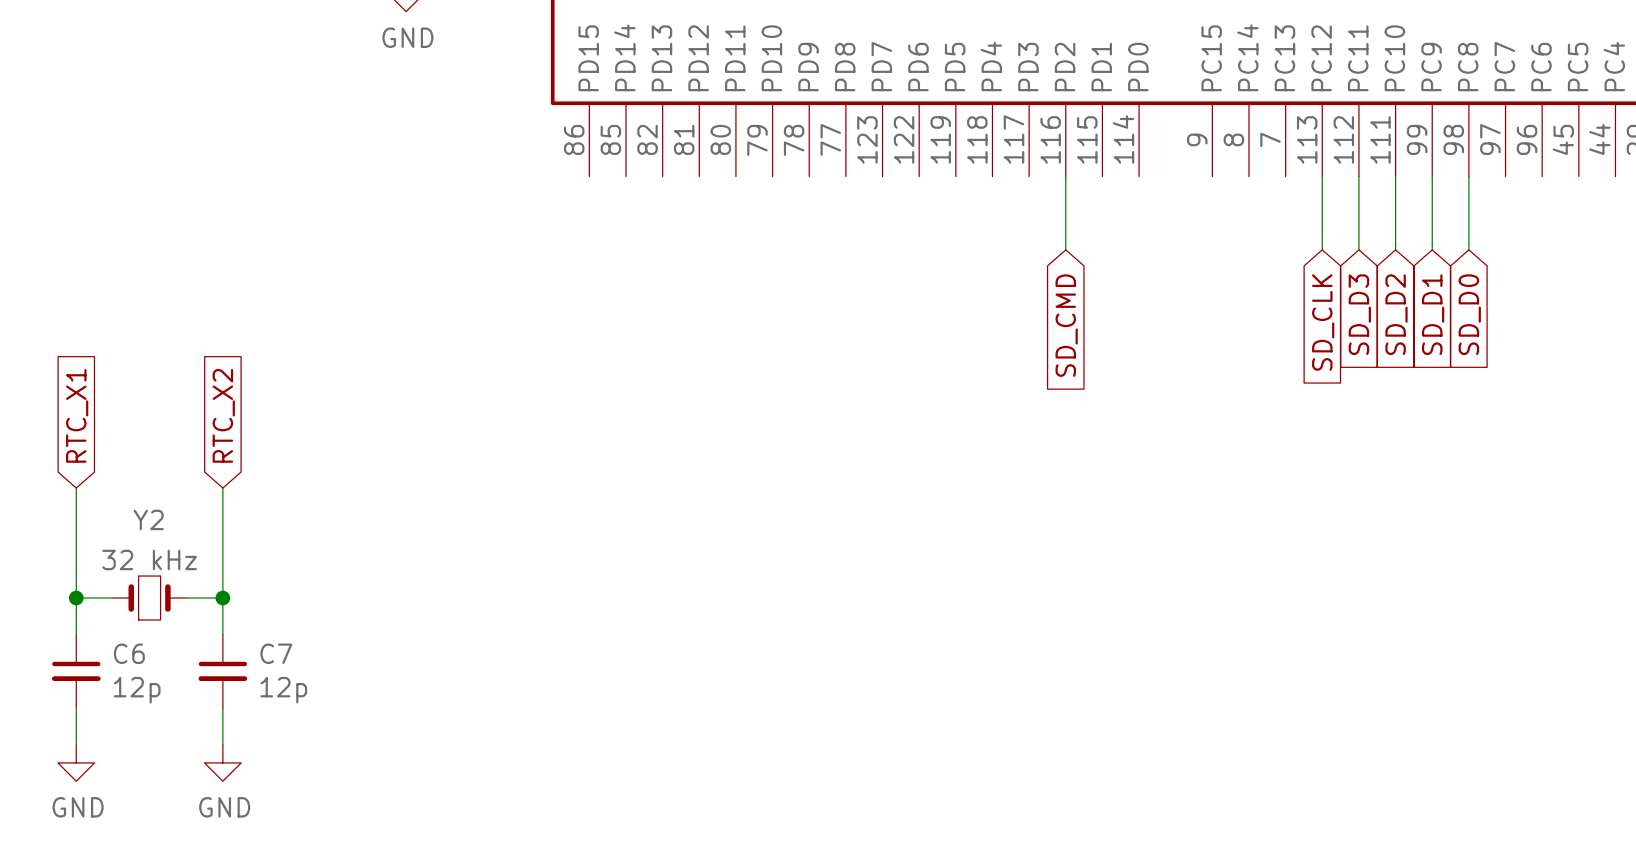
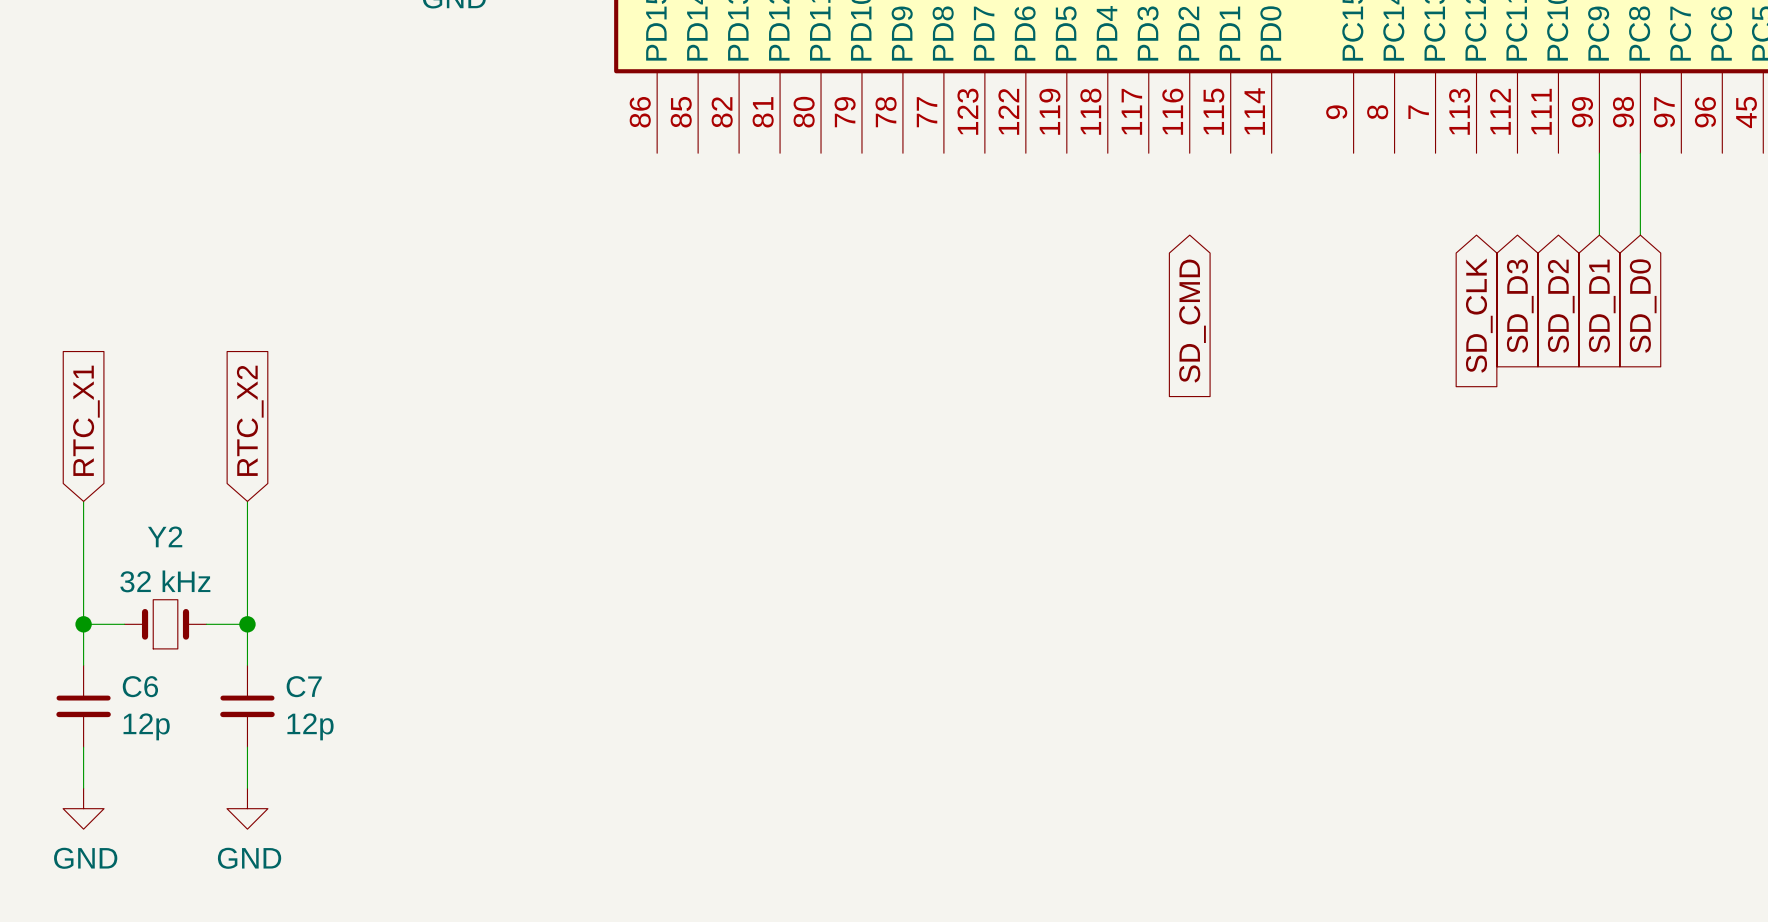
wire: (1065, 176) (1065, 249) -> none
wire: (1322, 176) (1322, 249) -> none
wire: (1358, 176) (1358, 249) -> none
wire: (1395, 176) (1395, 249) -> none

